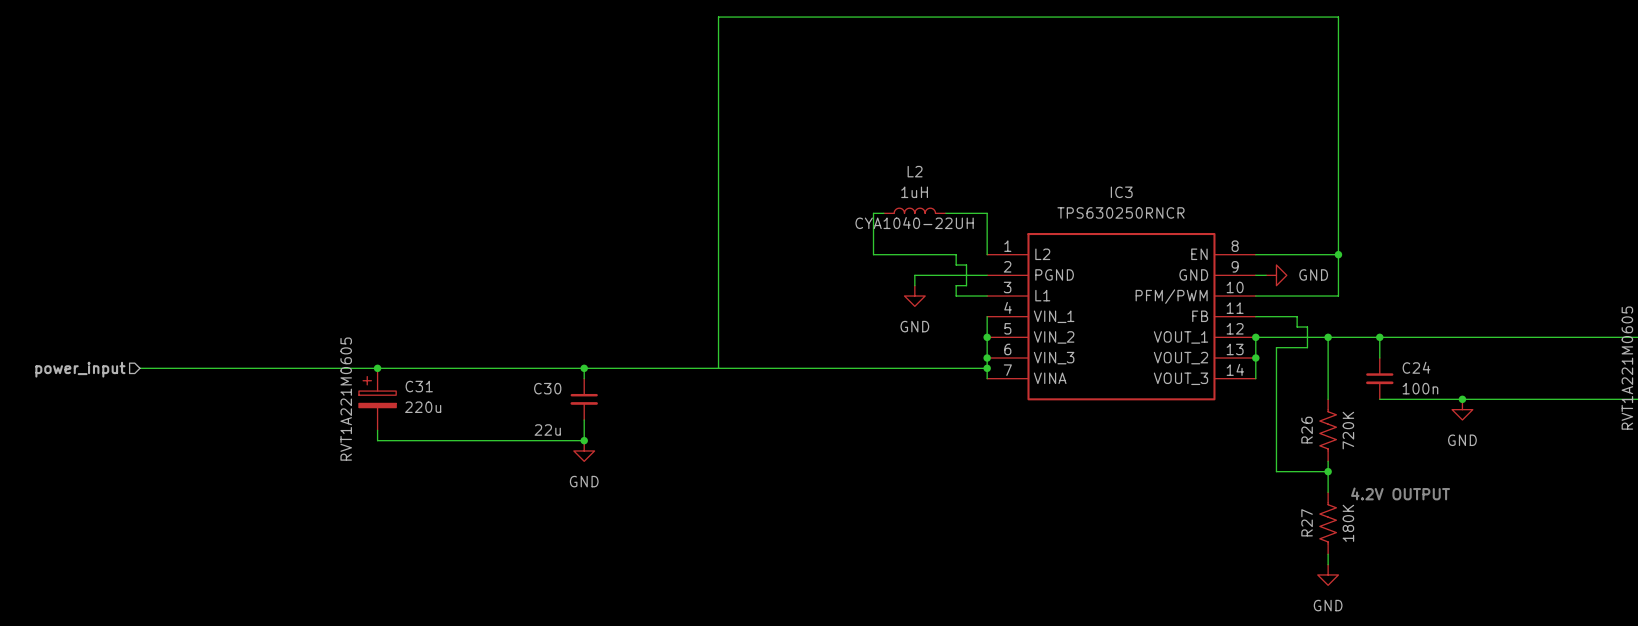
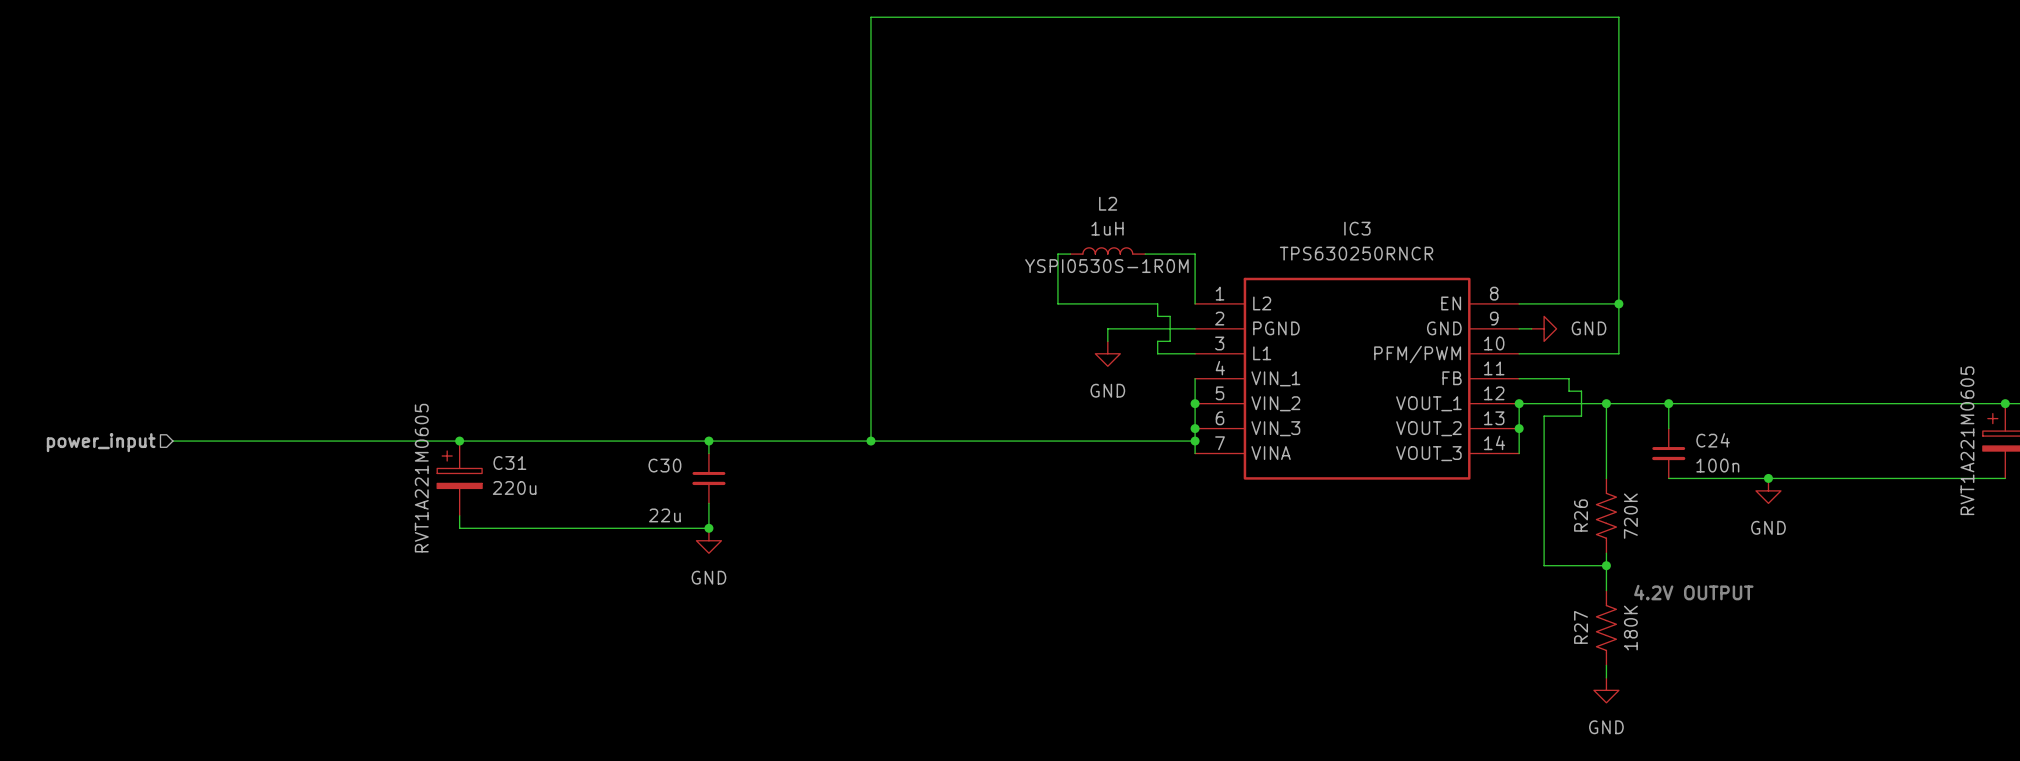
L2 text: CYA1040-22UH (914, 223) -> YSPI0530S-1R0M (1106, 266)
junction: none -> (870, 441)

